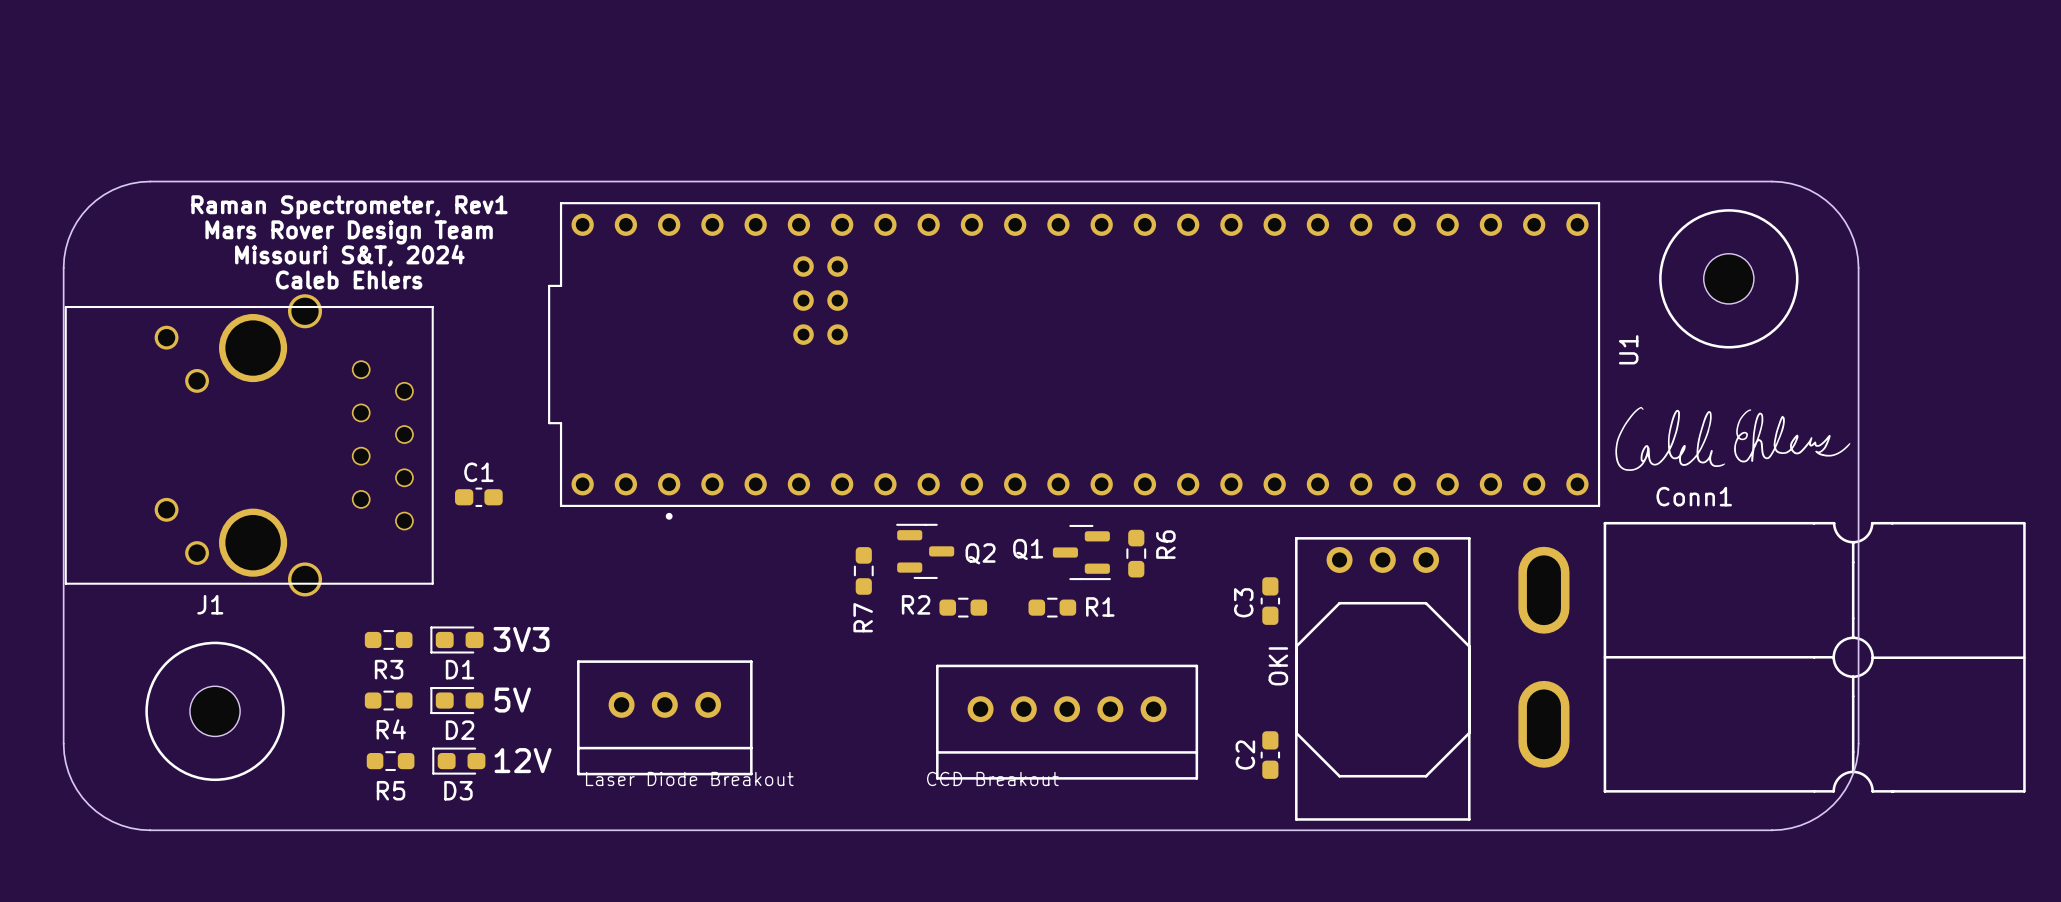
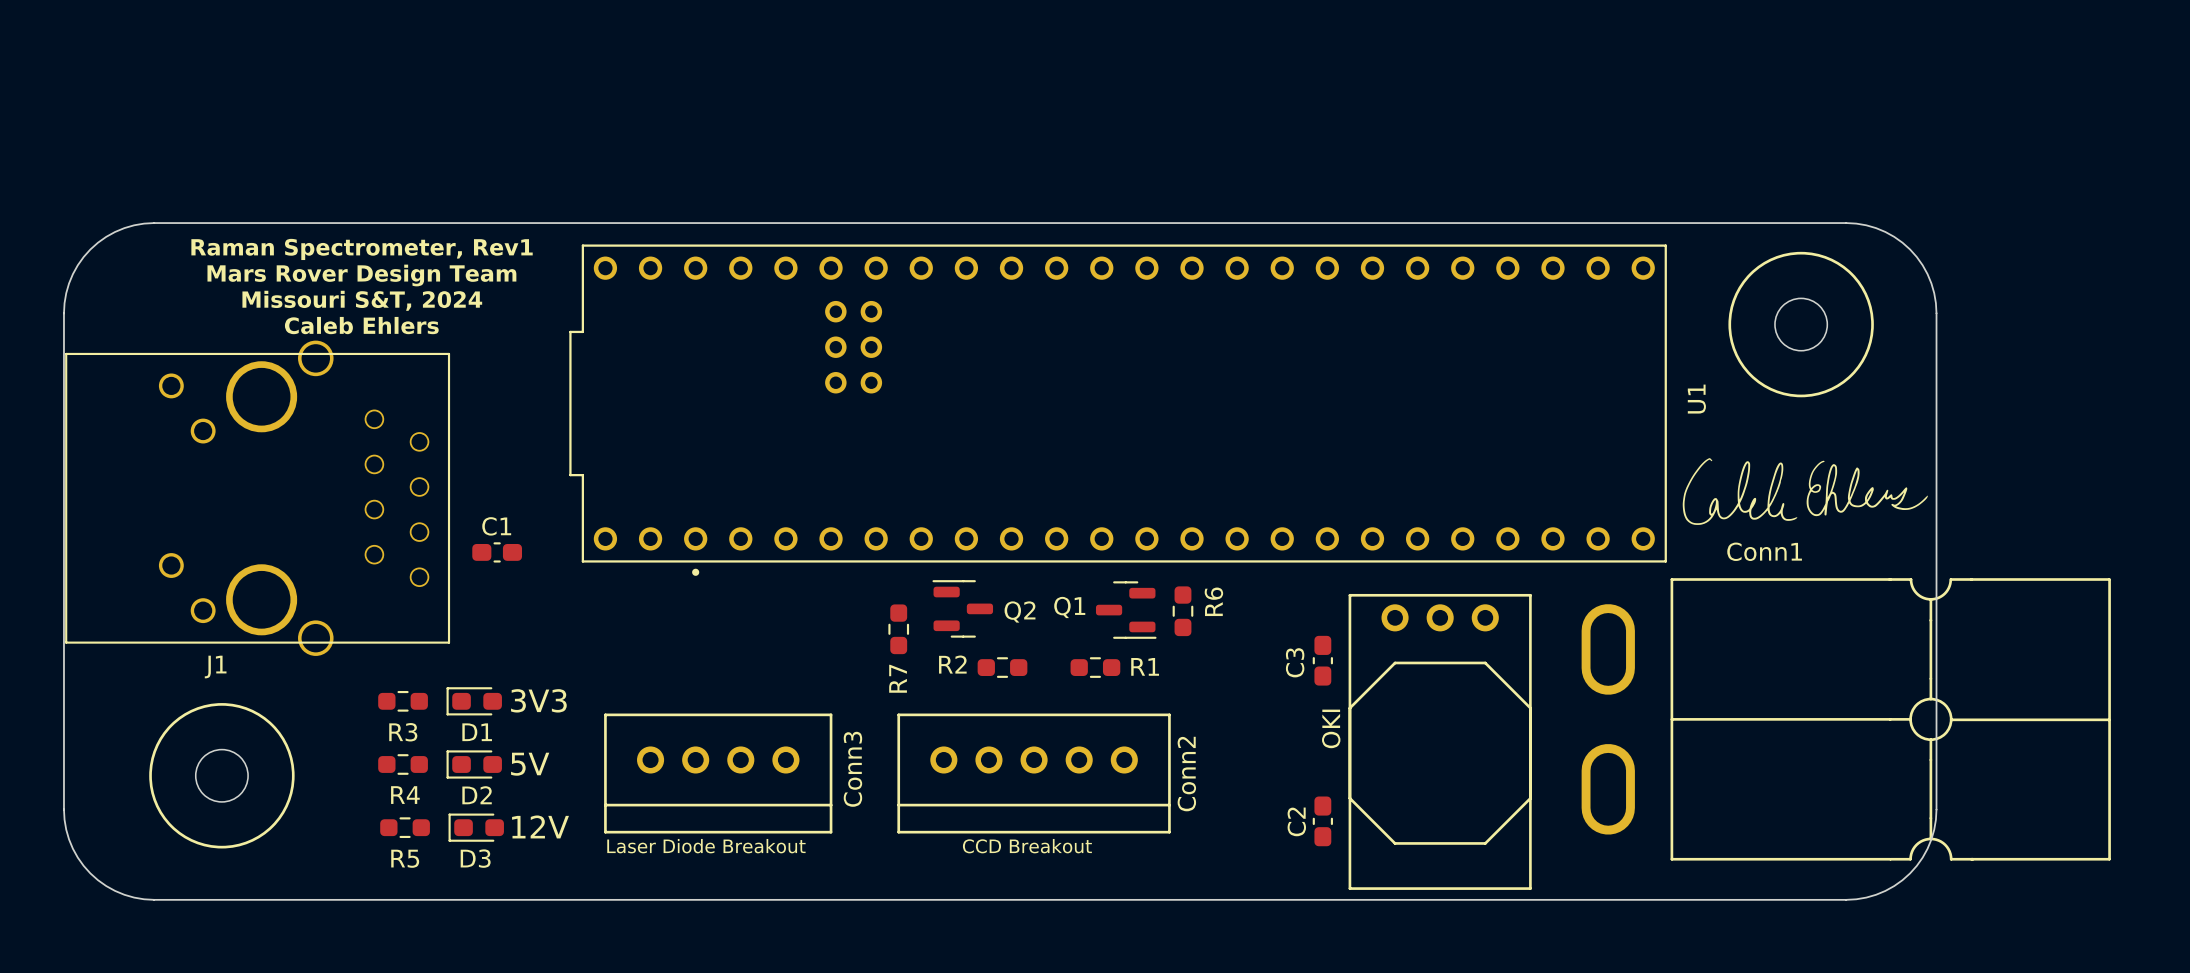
Conn3: none -> (718, 773)
Conn2: none -> (1034, 773)
part: (664, 717) -> none
part: (1067, 722) -> none

